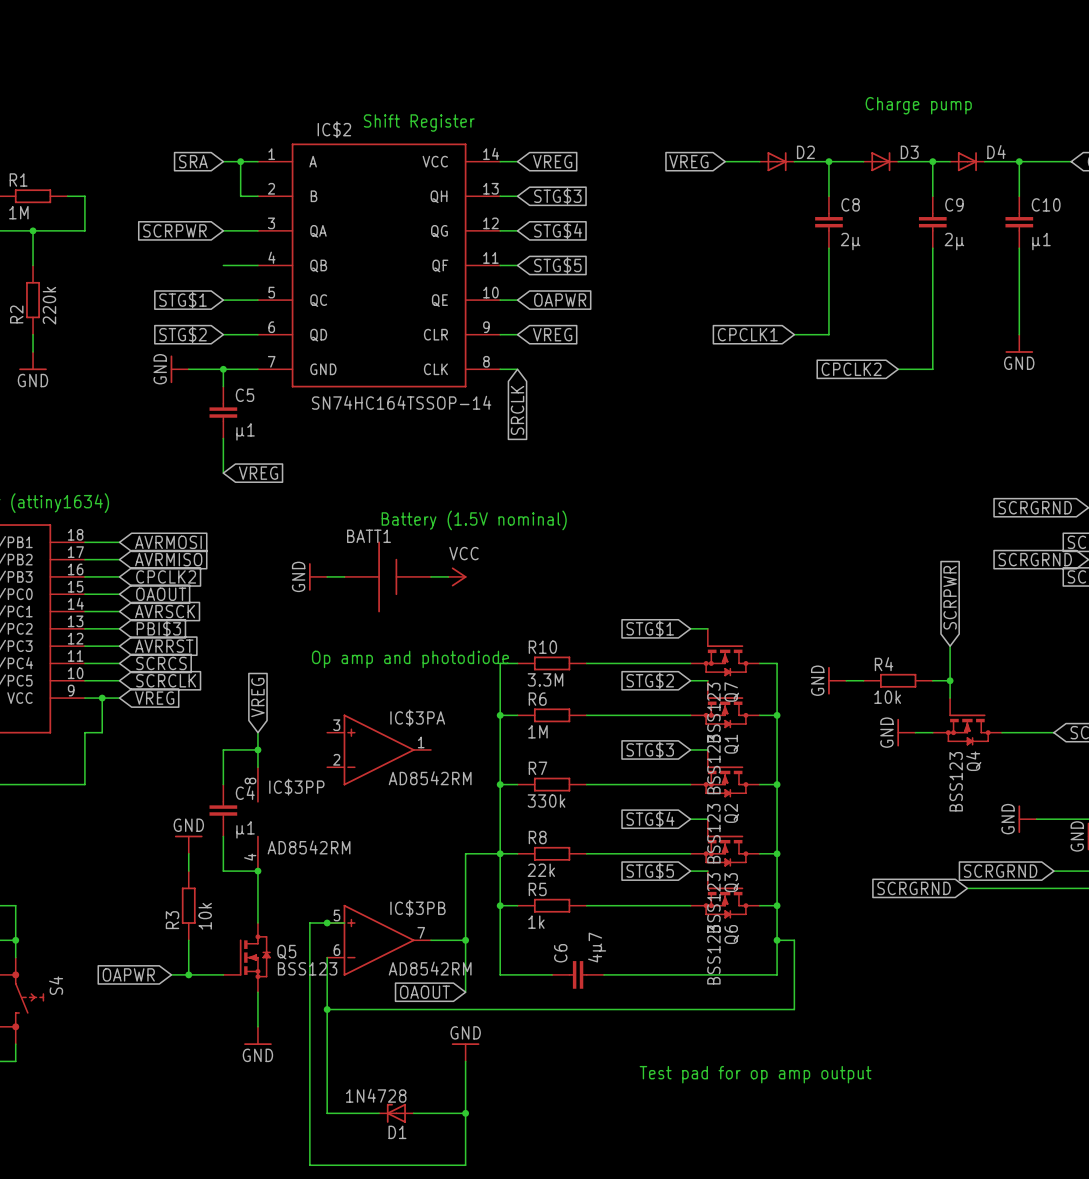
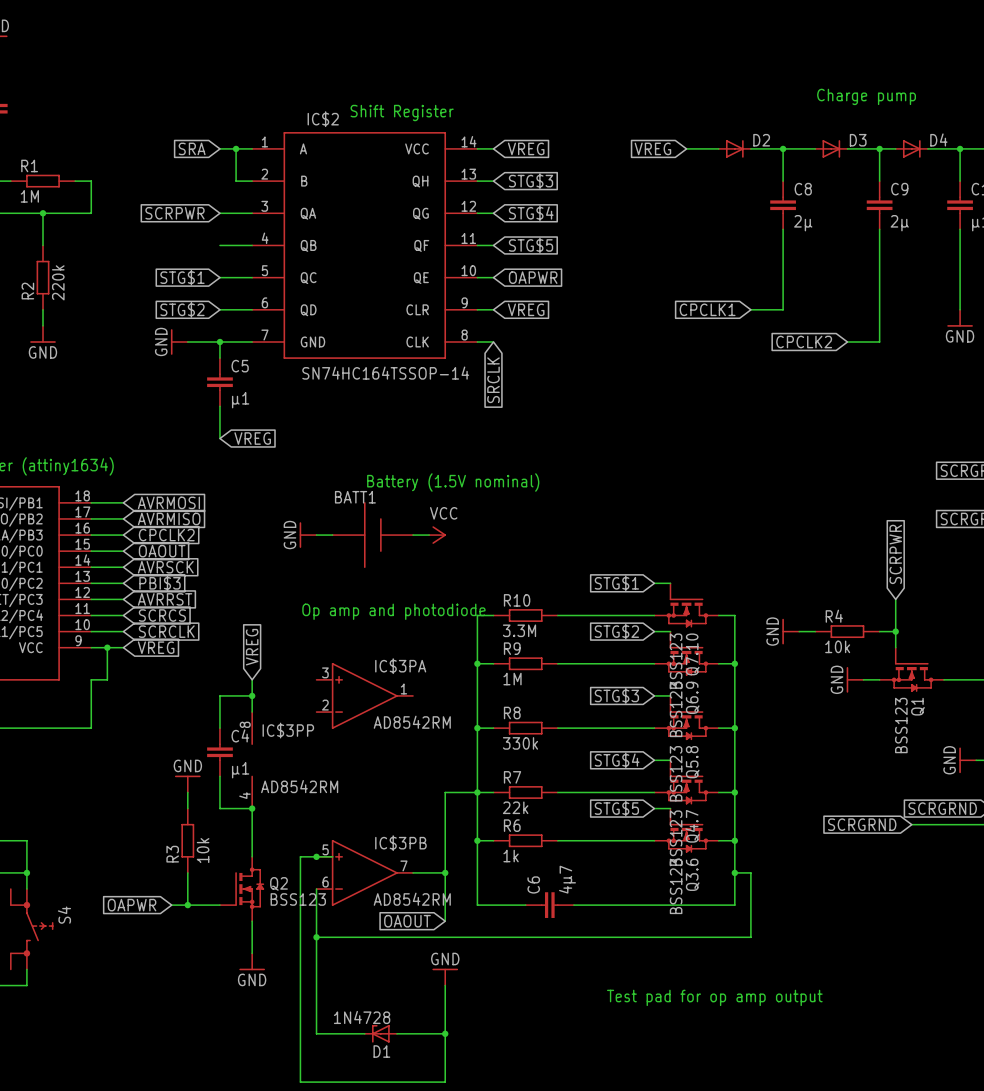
Q7 name: Q7 (731, 692) -> Q7.10 (692, 654)
R6 name: R6 (537, 699) -> R9 (512, 648)
Q1 name: Q1 (731, 744) -> Q6.9 (692, 697)
Q4 name: Q4 (973, 761) -> Q1 (917, 706)
R7 name: R7 (537, 768) -> R8 (512, 713)
Q2 name: Q2 (731, 813) -> Q5.8 (692, 762)
R8 name: R8 (537, 837) -> R7 (512, 777)
Q3 name: Q3 (731, 882) -> Q4.7 (692, 826)
R5 name: R5 (537, 889) -> R6 (512, 825)
Q6 name: Q6 (731, 934) -> Q3.6 (692, 874)
Q5 name: Q5 (286, 952) -> Q2 (278, 883)

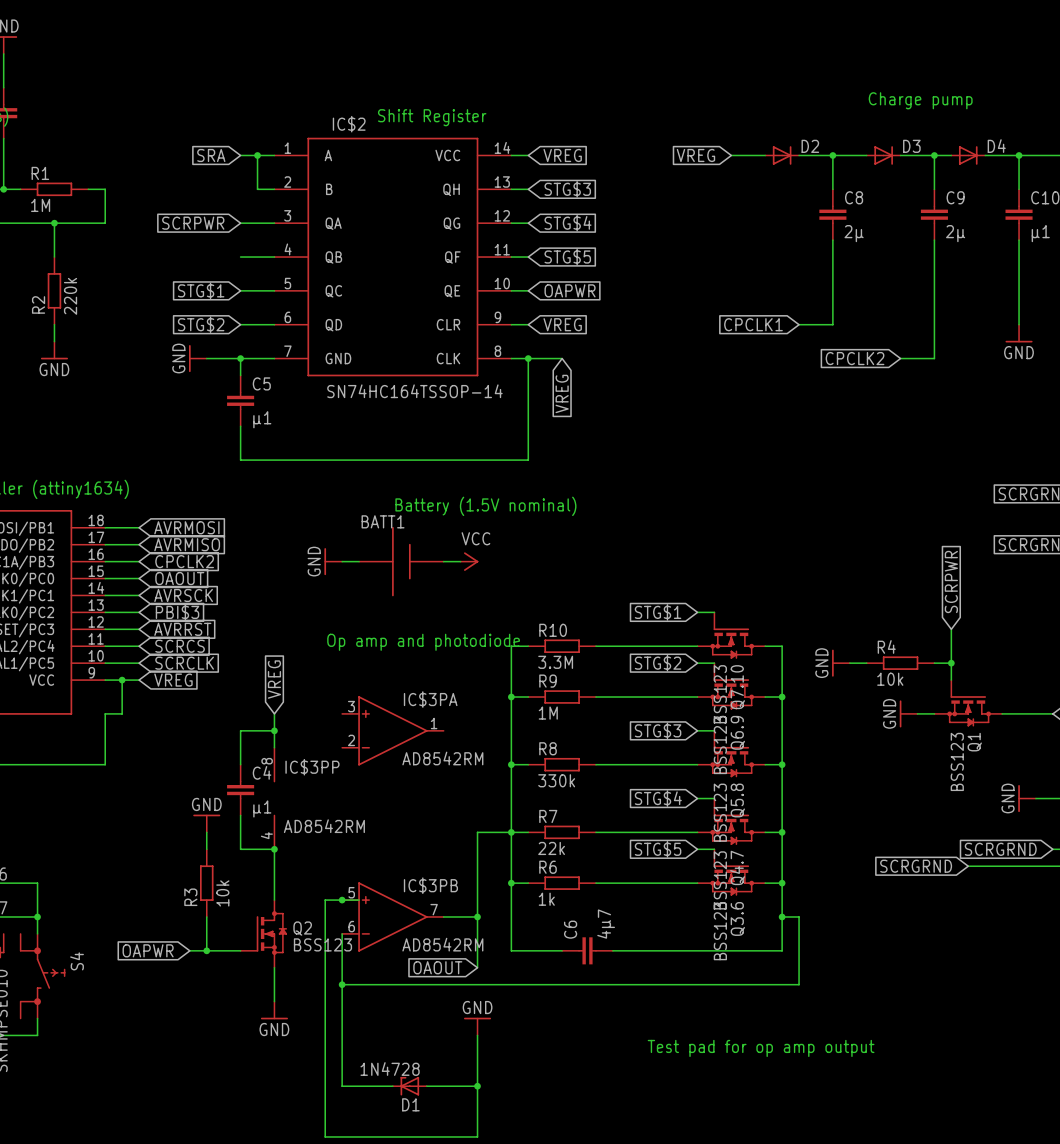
junction: none -> (528, 358)
wire: none -> (562, 358) (528, 358) (528, 460) (240, 460)
global label: none -> VREG (562, 393)
global label: SRCLK (493, 380) -> none
global label: VREG (252, 438) -> none

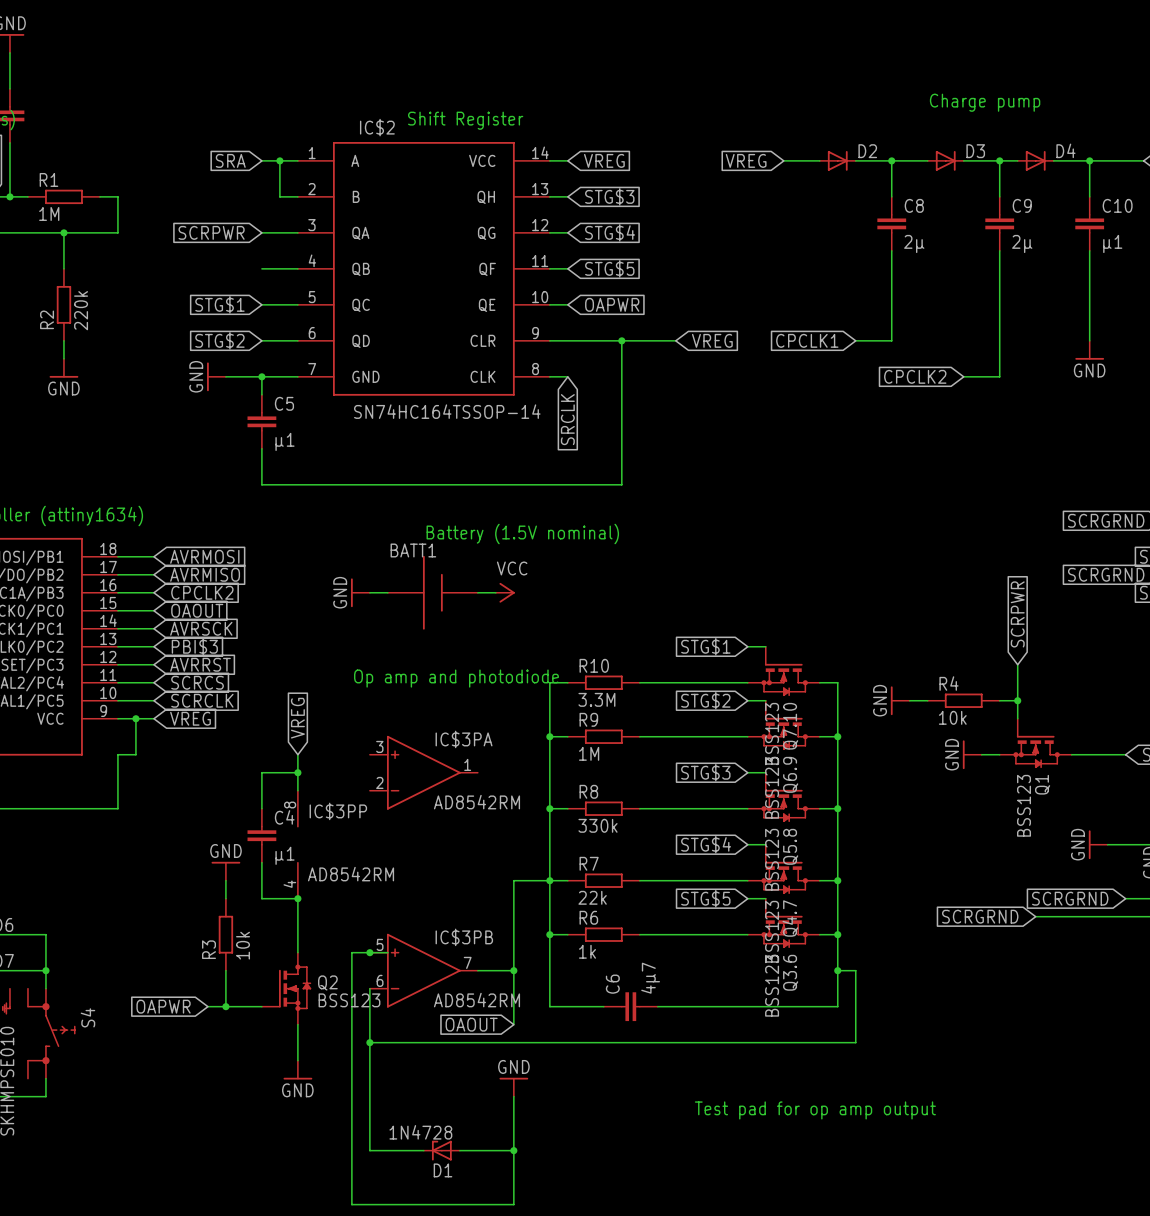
wire: none -> (567, 340) (675, 340)
global label: VREG (562, 324) -> none
junction: none -> (621, 340)
global label: none -> VREG (712, 340)
junction: (528, 358) -> none
wire: (562, 358) (528, 358) (528, 460) -> (621, 340) (621, 484) (567, 484)
global label: VREG (562, 393) -> none
global label: none -> SRCLK (567, 419)

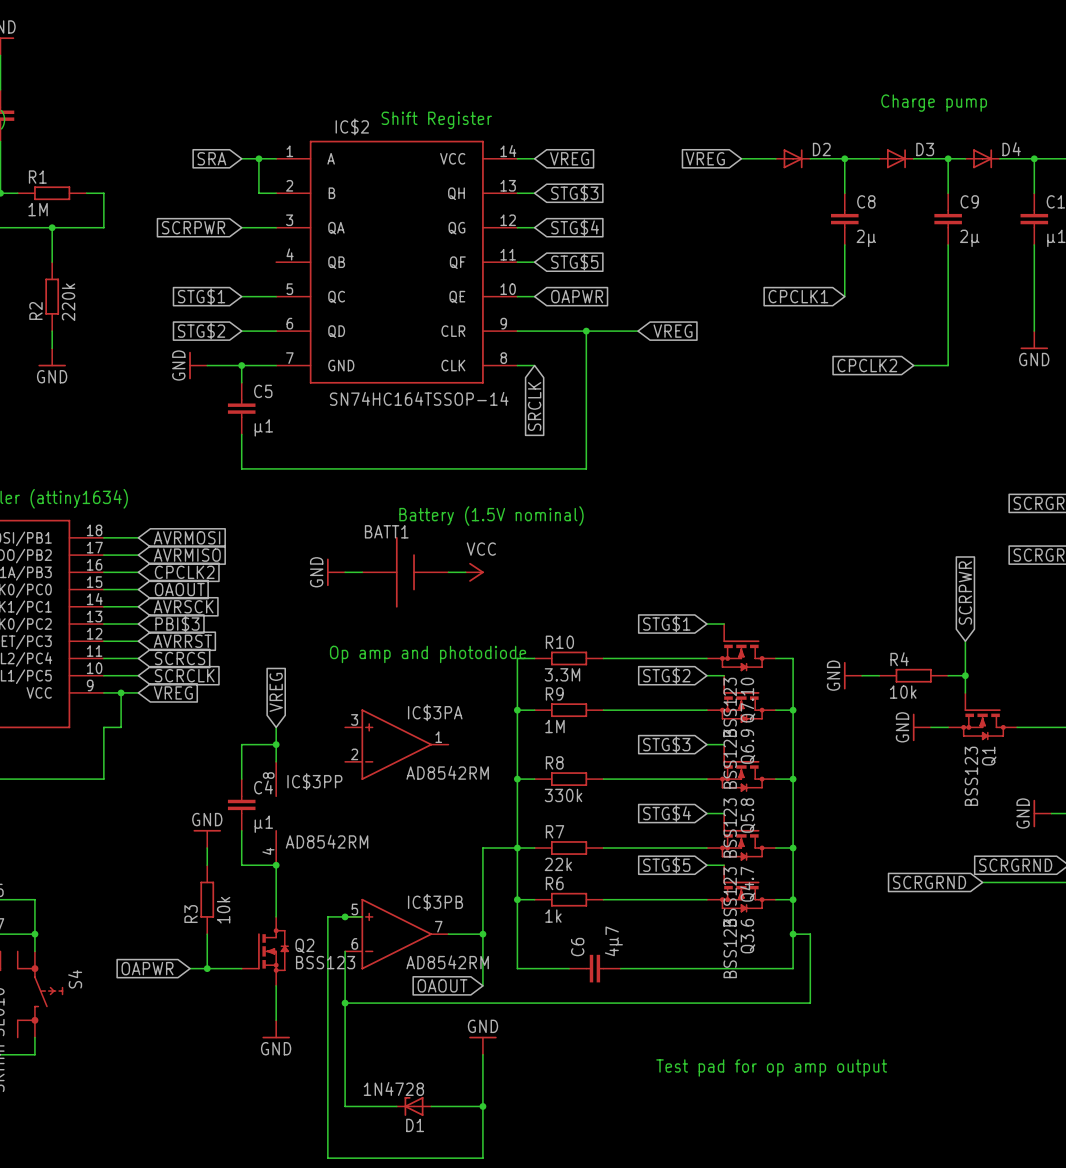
wire: (261, 268) (297, 268) -> none
wire: (891, 304) (891, 340) (855, 340) -> none
global label position: CPCLK1 (807, 340) -> CPCLK1 (798, 296)

